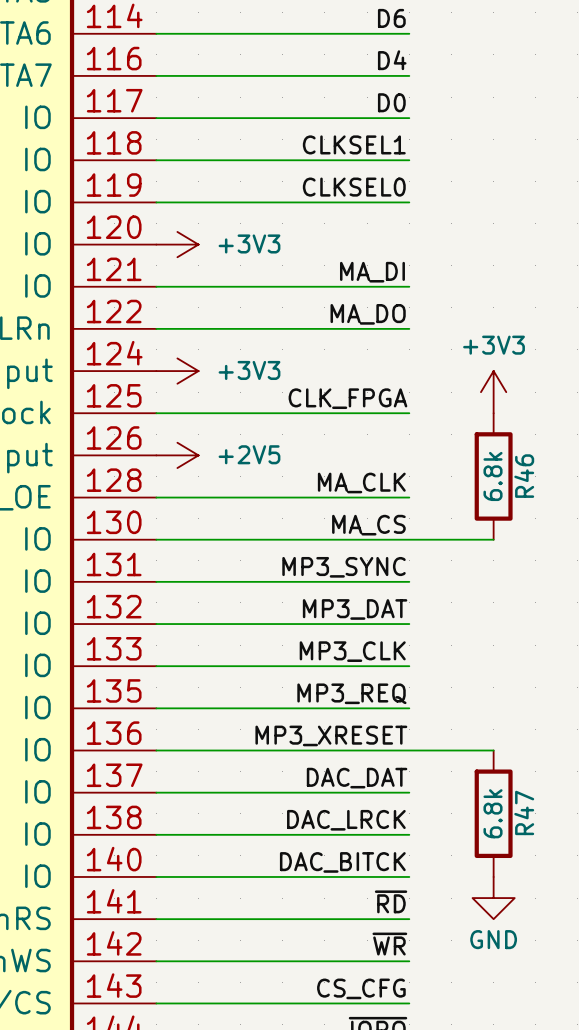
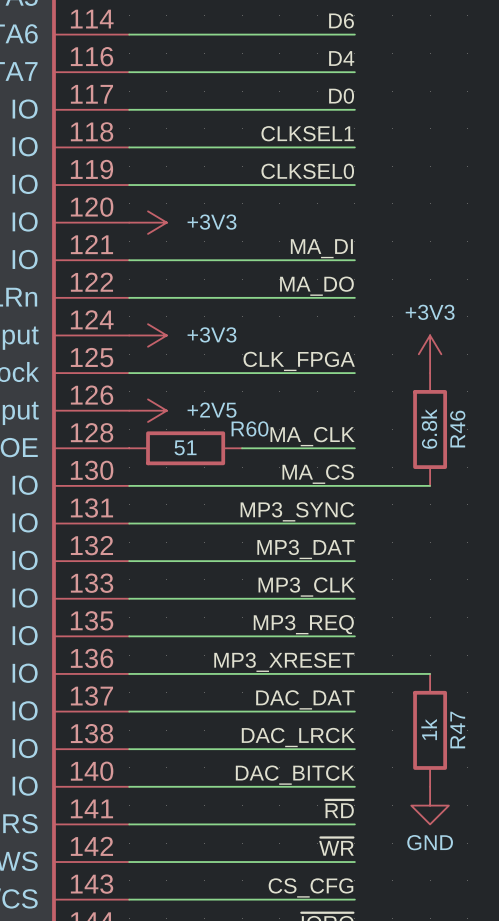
wire: (156, 497) (282, 497) -> none
R60: none -> 51 (185, 448)
R47 value: 6.8k (493, 813) -> 1k (429, 729)

